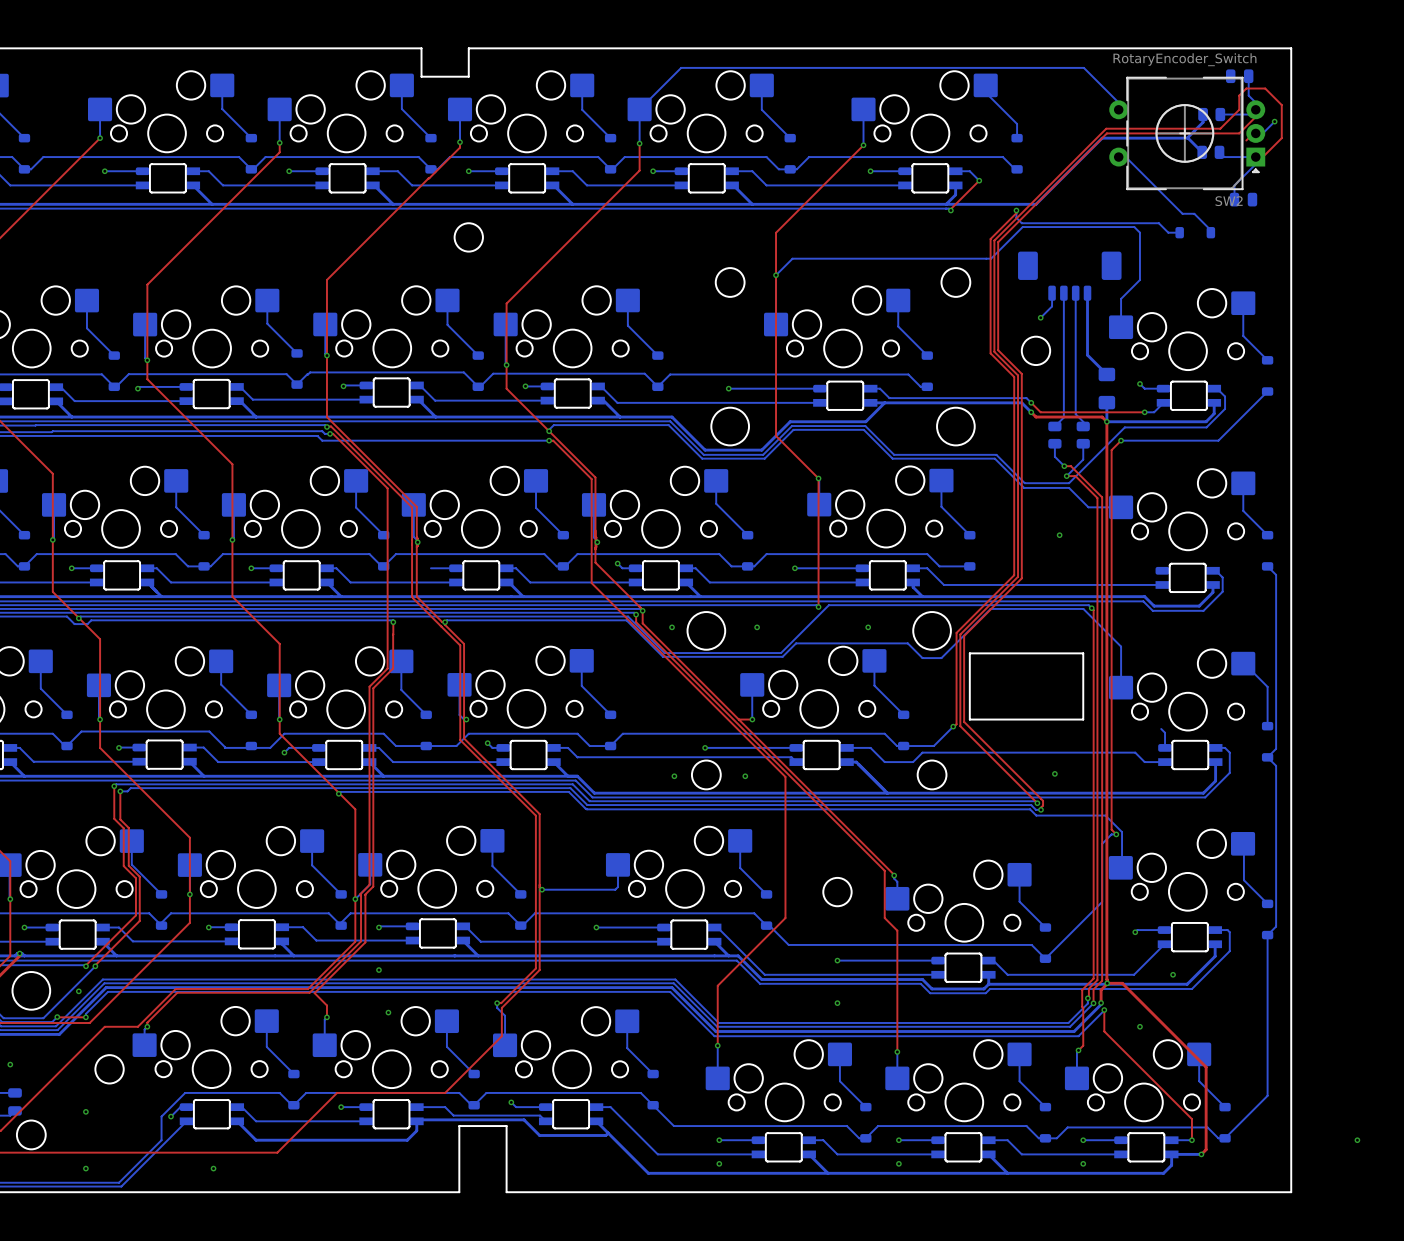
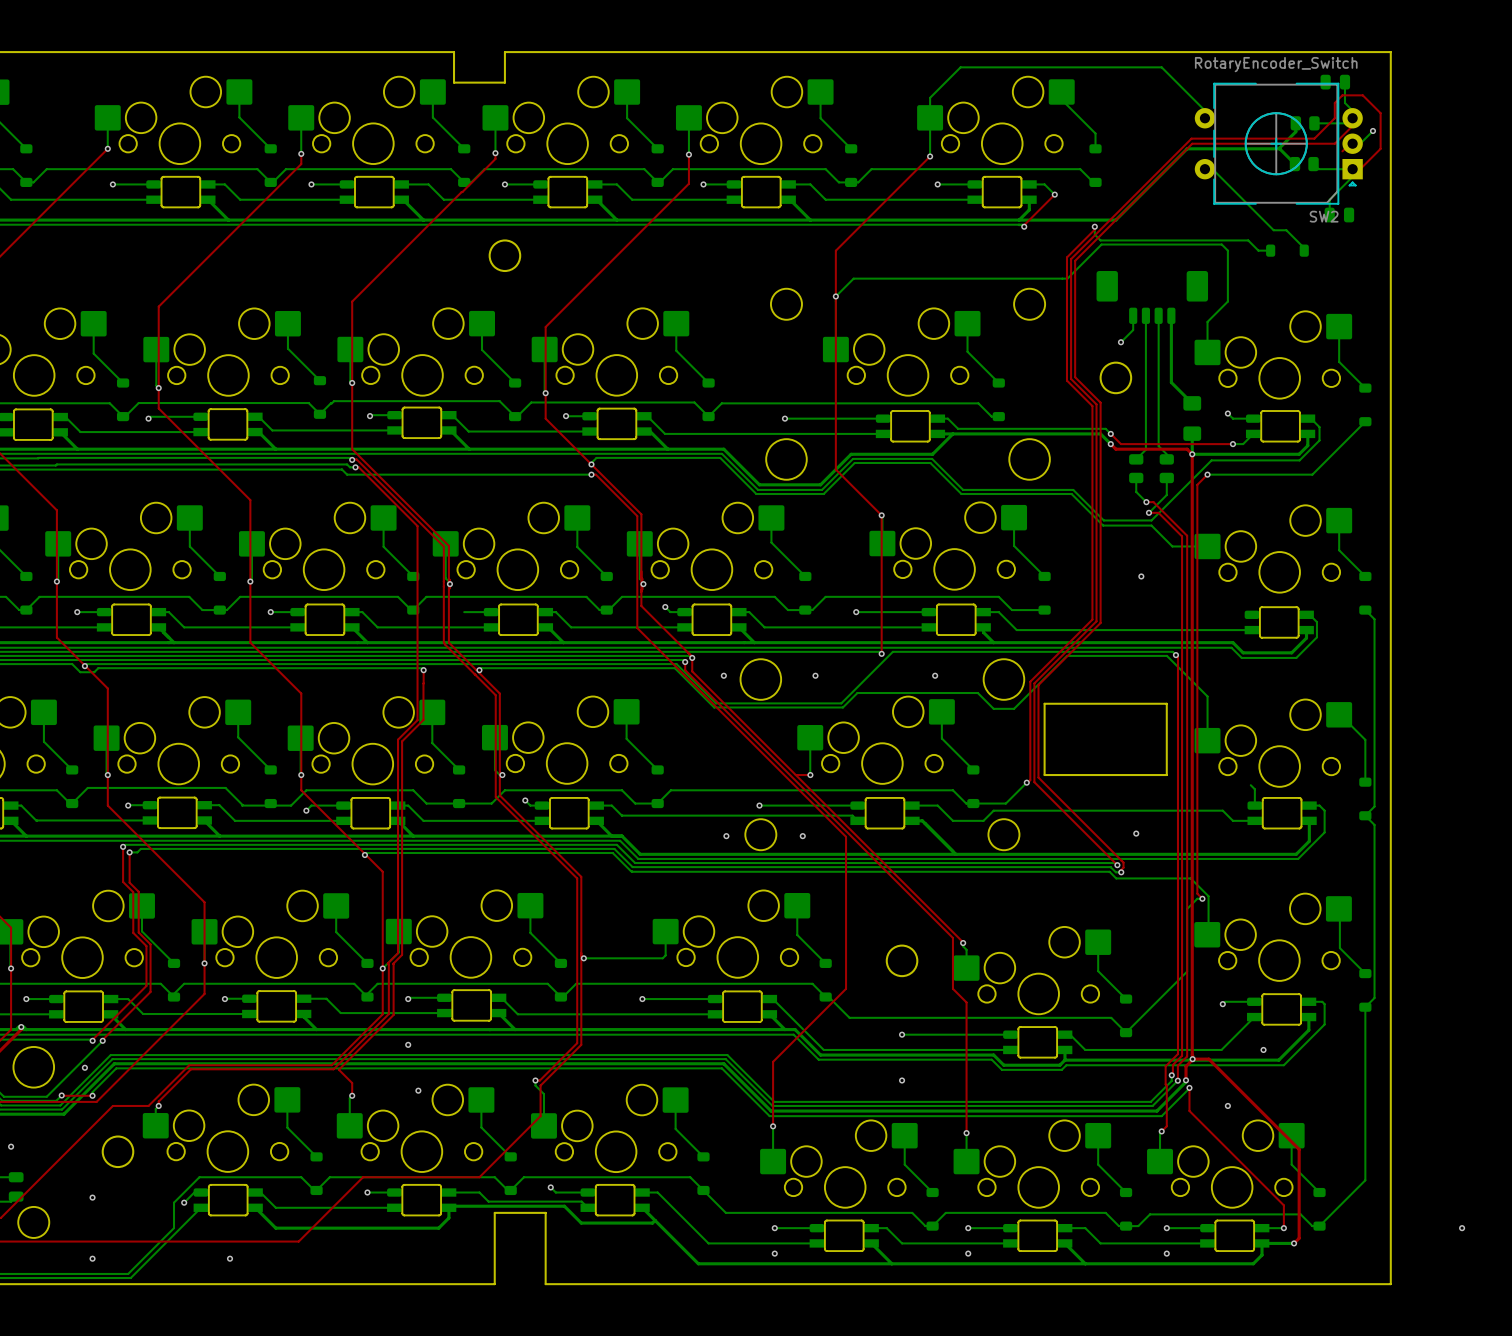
bottom track: (1083, 67) (681, 67) (639, 109) -> (1167, 73) (1161, 67) (960, 67) (930, 97) (930, 117)

